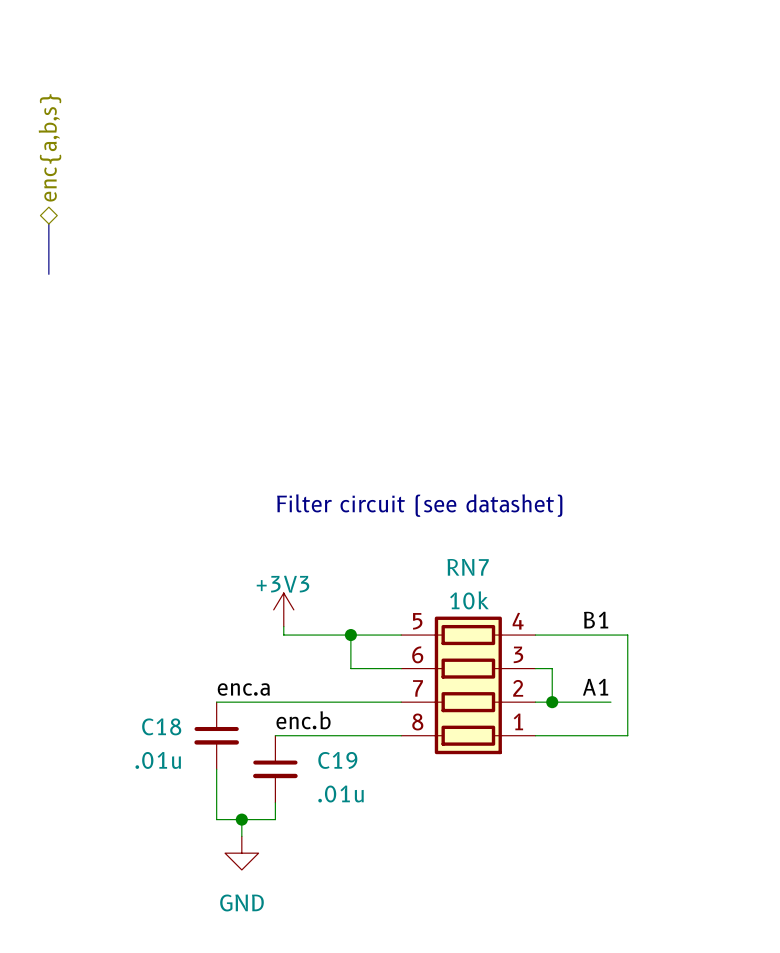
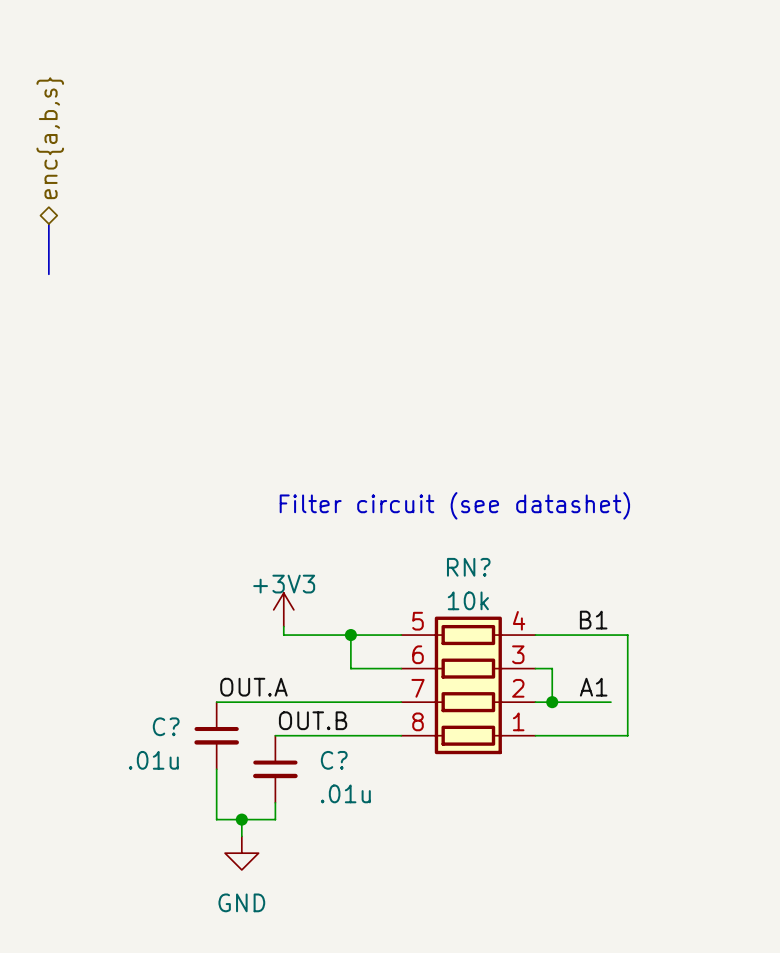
RN7 name: RN7 (468, 567) -> RN? (468, 567)
label: enc.a (243, 689) -> OUT.A (253, 687)
label: enc.b (303, 720) -> OUT.B (313, 720)
C18 name: C18 (161, 726) -> C? (166, 726)
C19 name: C19 (337, 760) -> C? (334, 760)

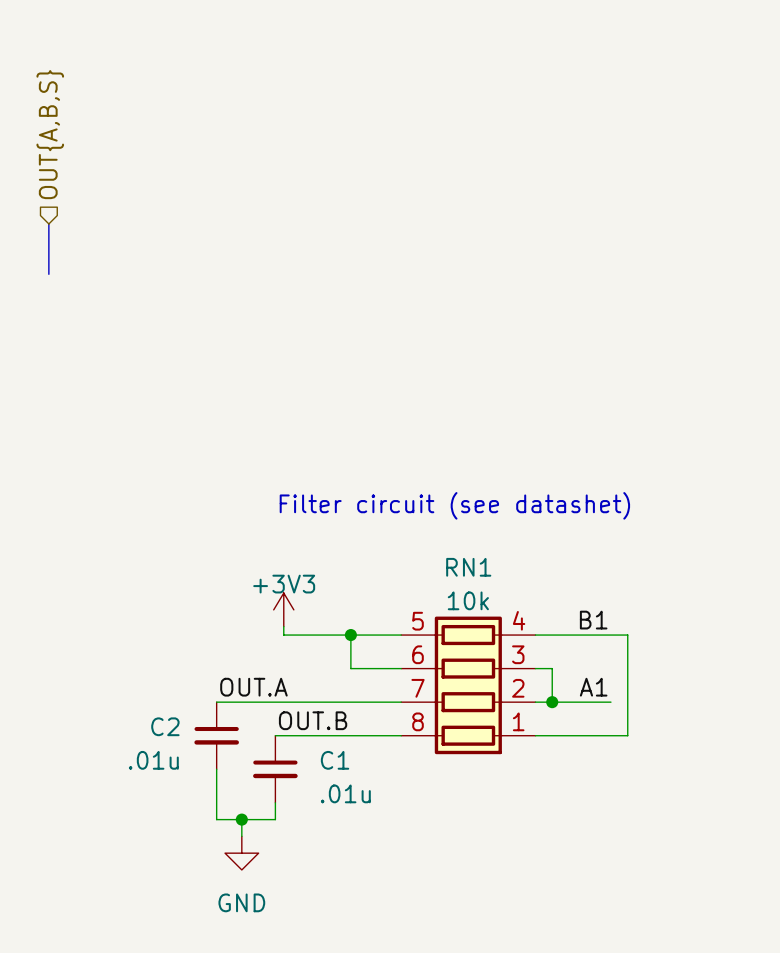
hierarchical label shape: bidirectional (50, 138) -> input (50, 134)
hierarchical label: enc{a,b,s} (50, 138) -> OUT{A,B,S} (50, 134)
RN? name: RN? (468, 567) -> RN1 (468, 567)
C? name: C? (166, 726) -> C2 (165, 726)
C? name: C? (334, 760) -> C1 (335, 760)

